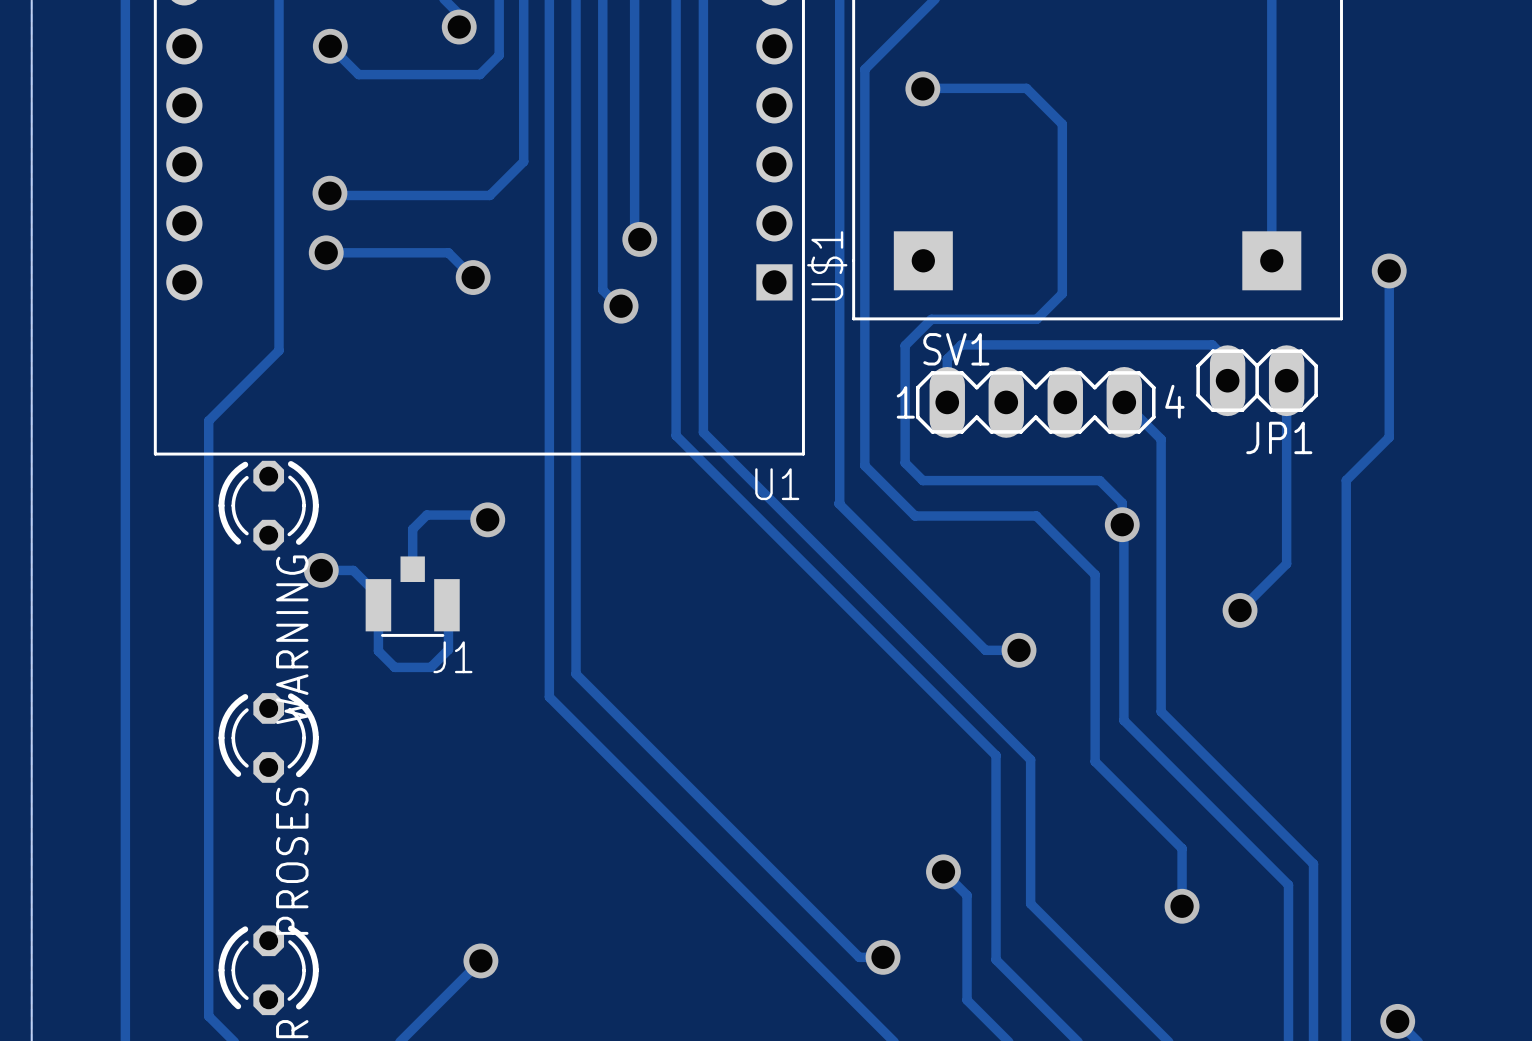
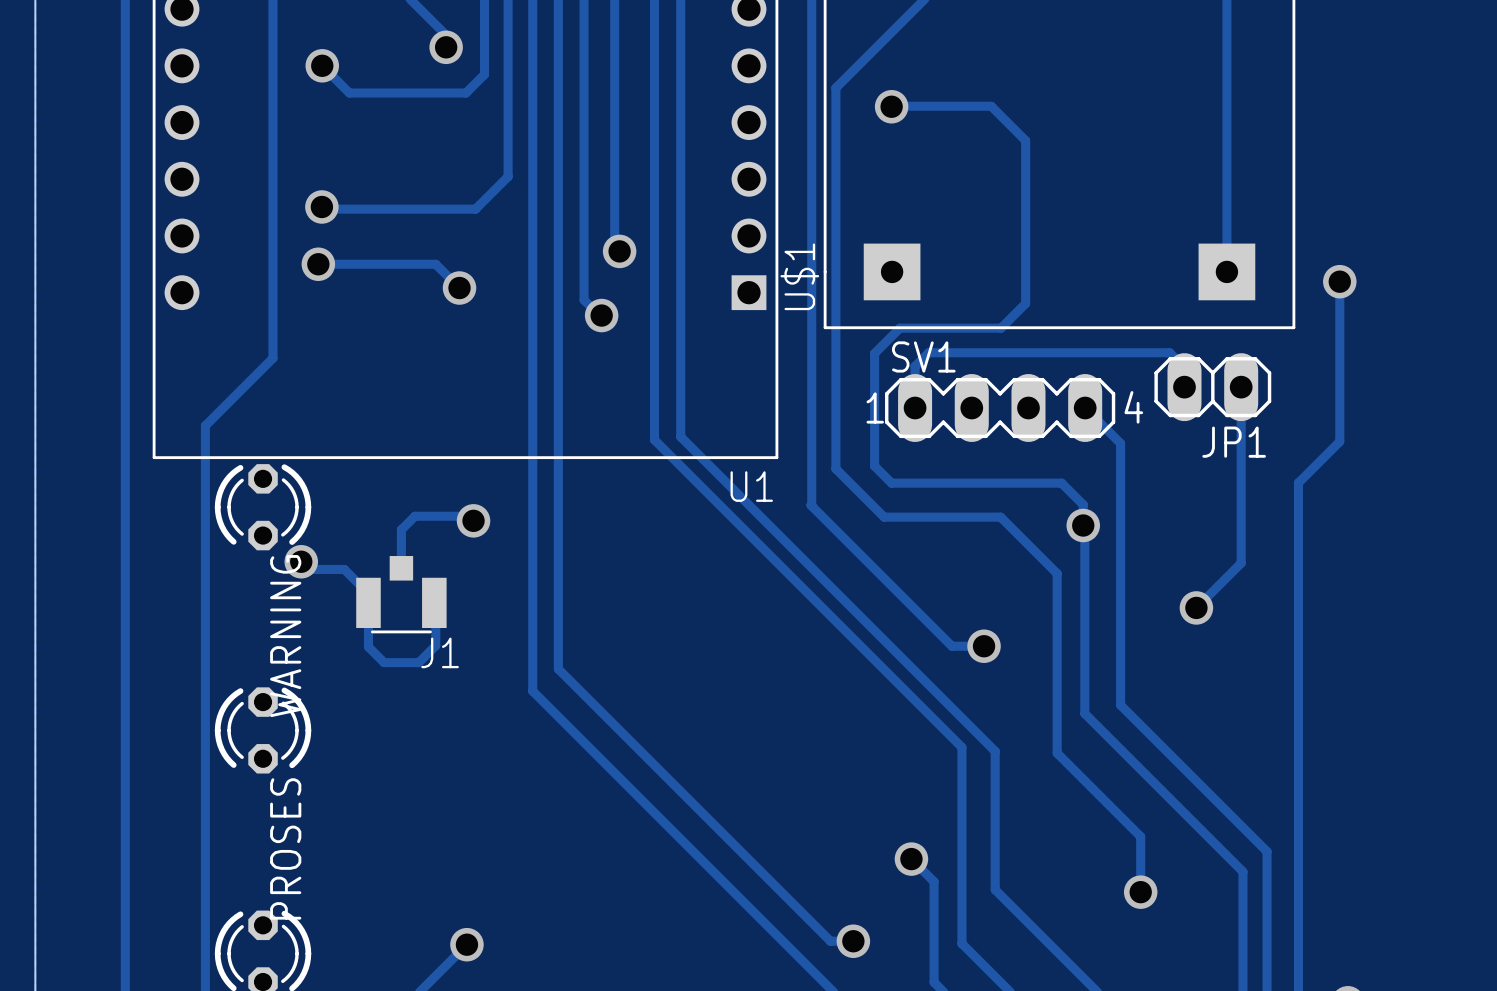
via position: (321, 570) -> (301, 561)

